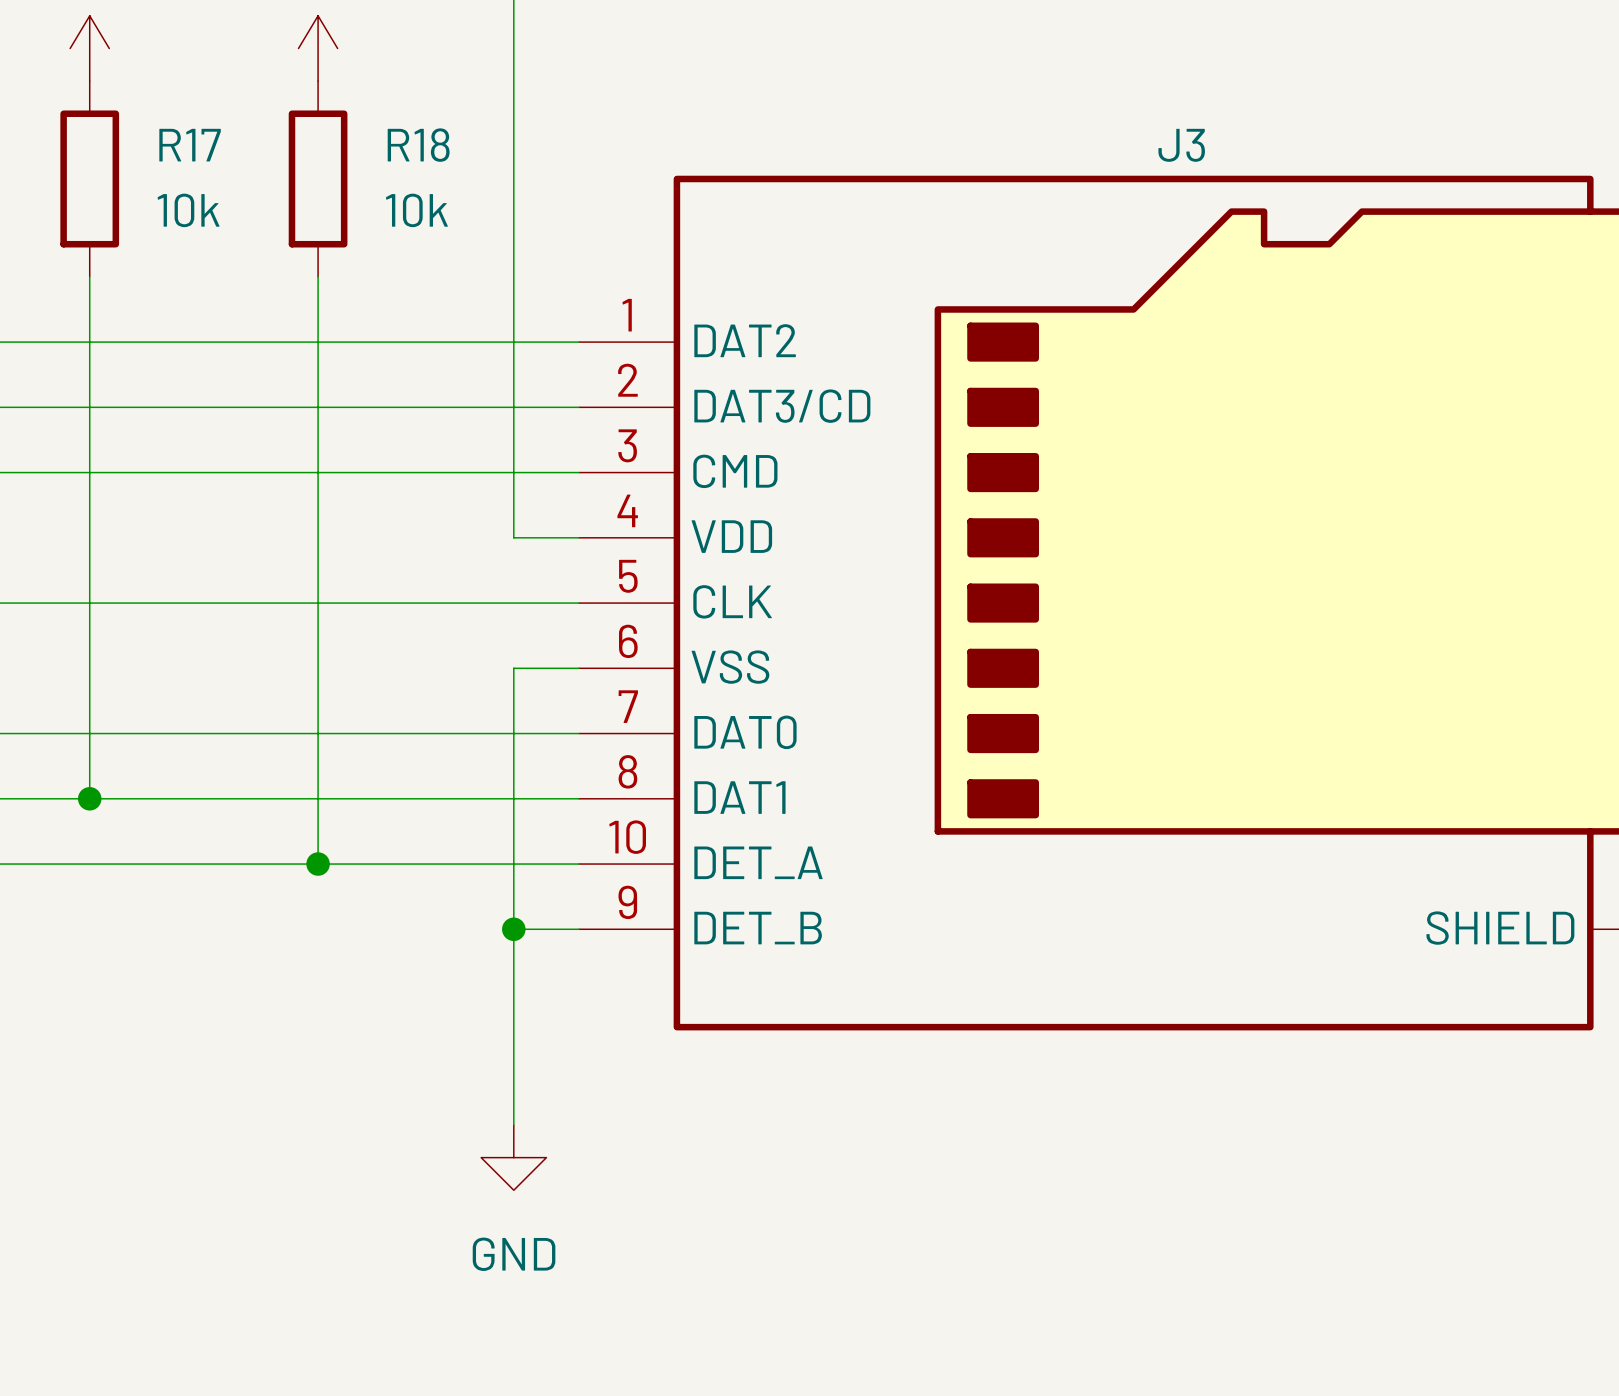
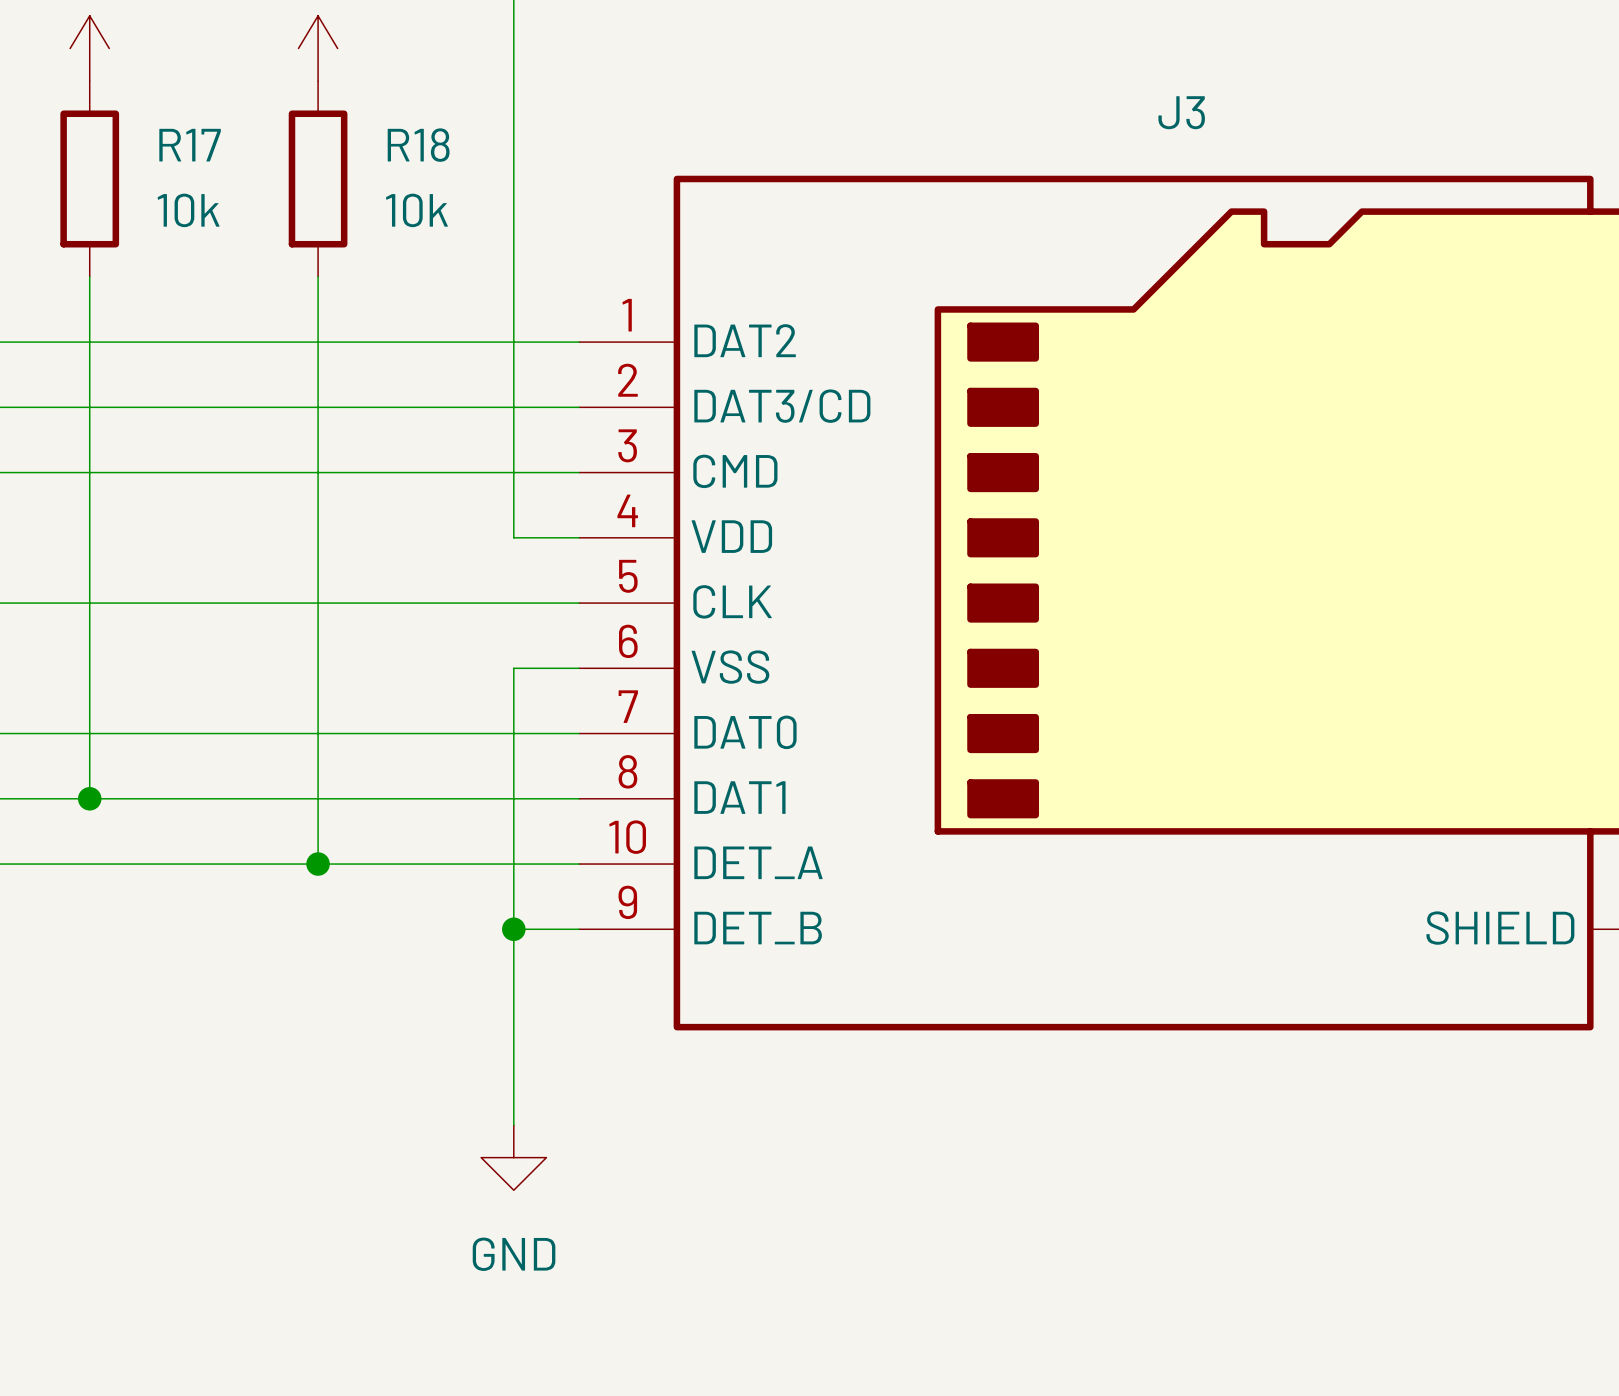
J3 name position: J3 (1181, 145) -> J3 (1181, 112)

